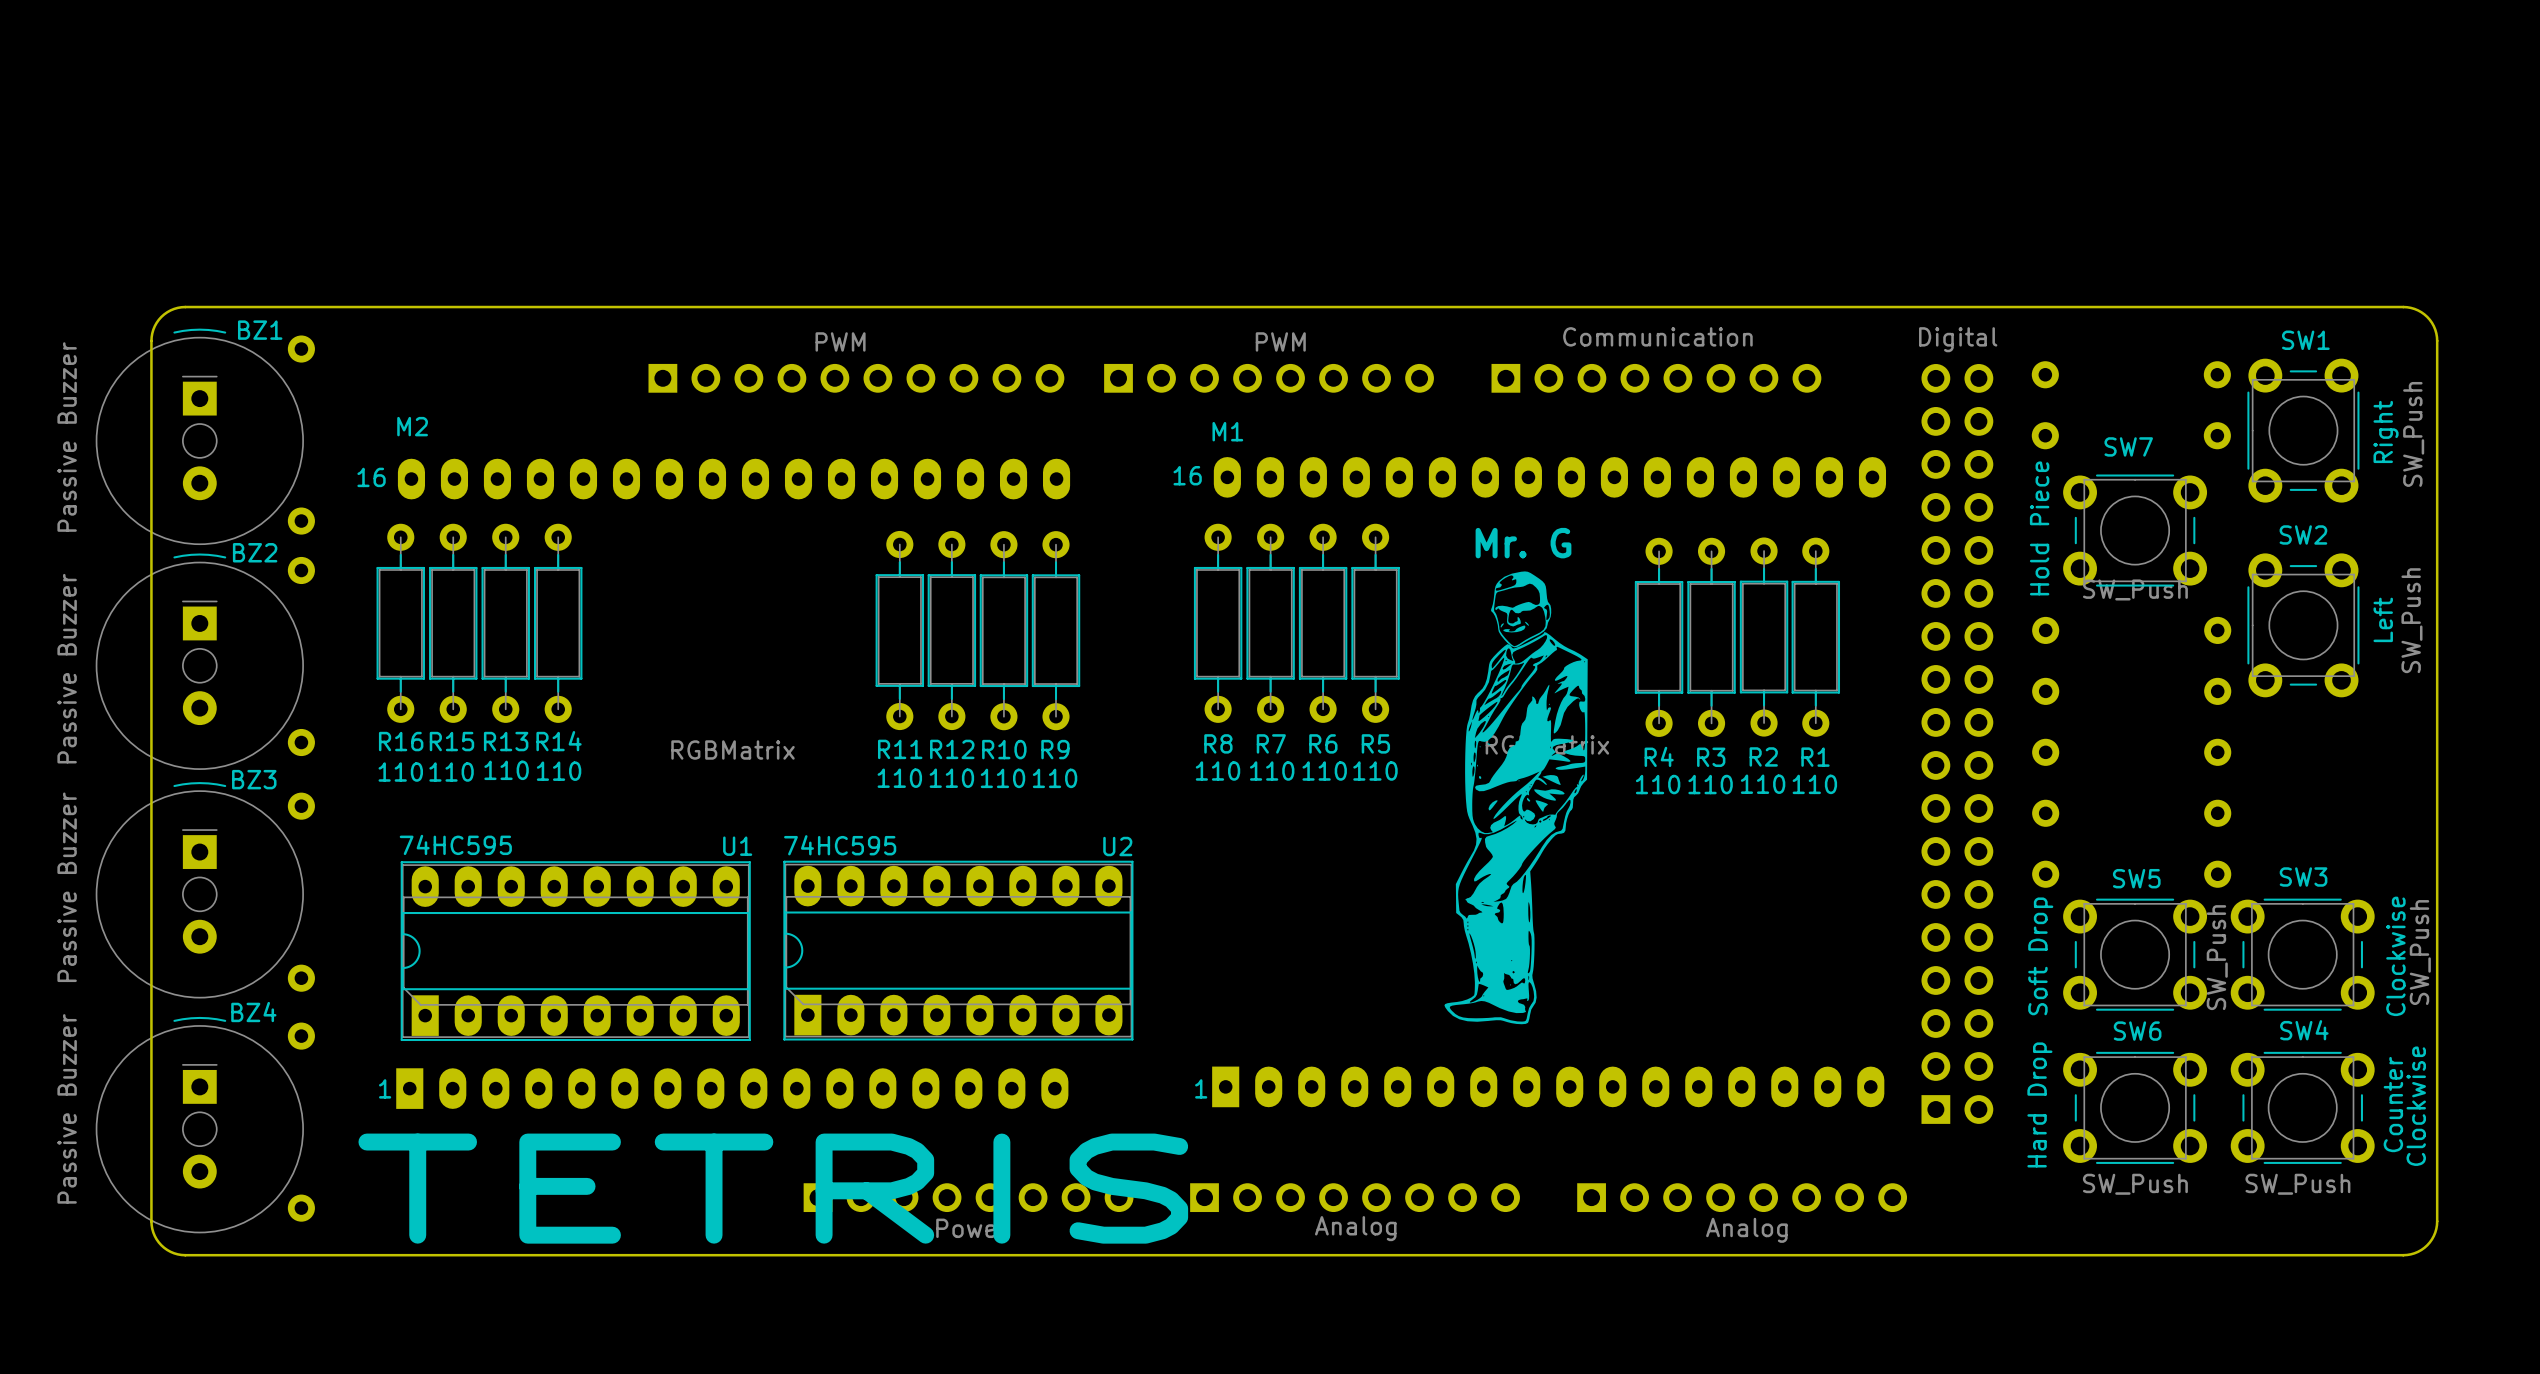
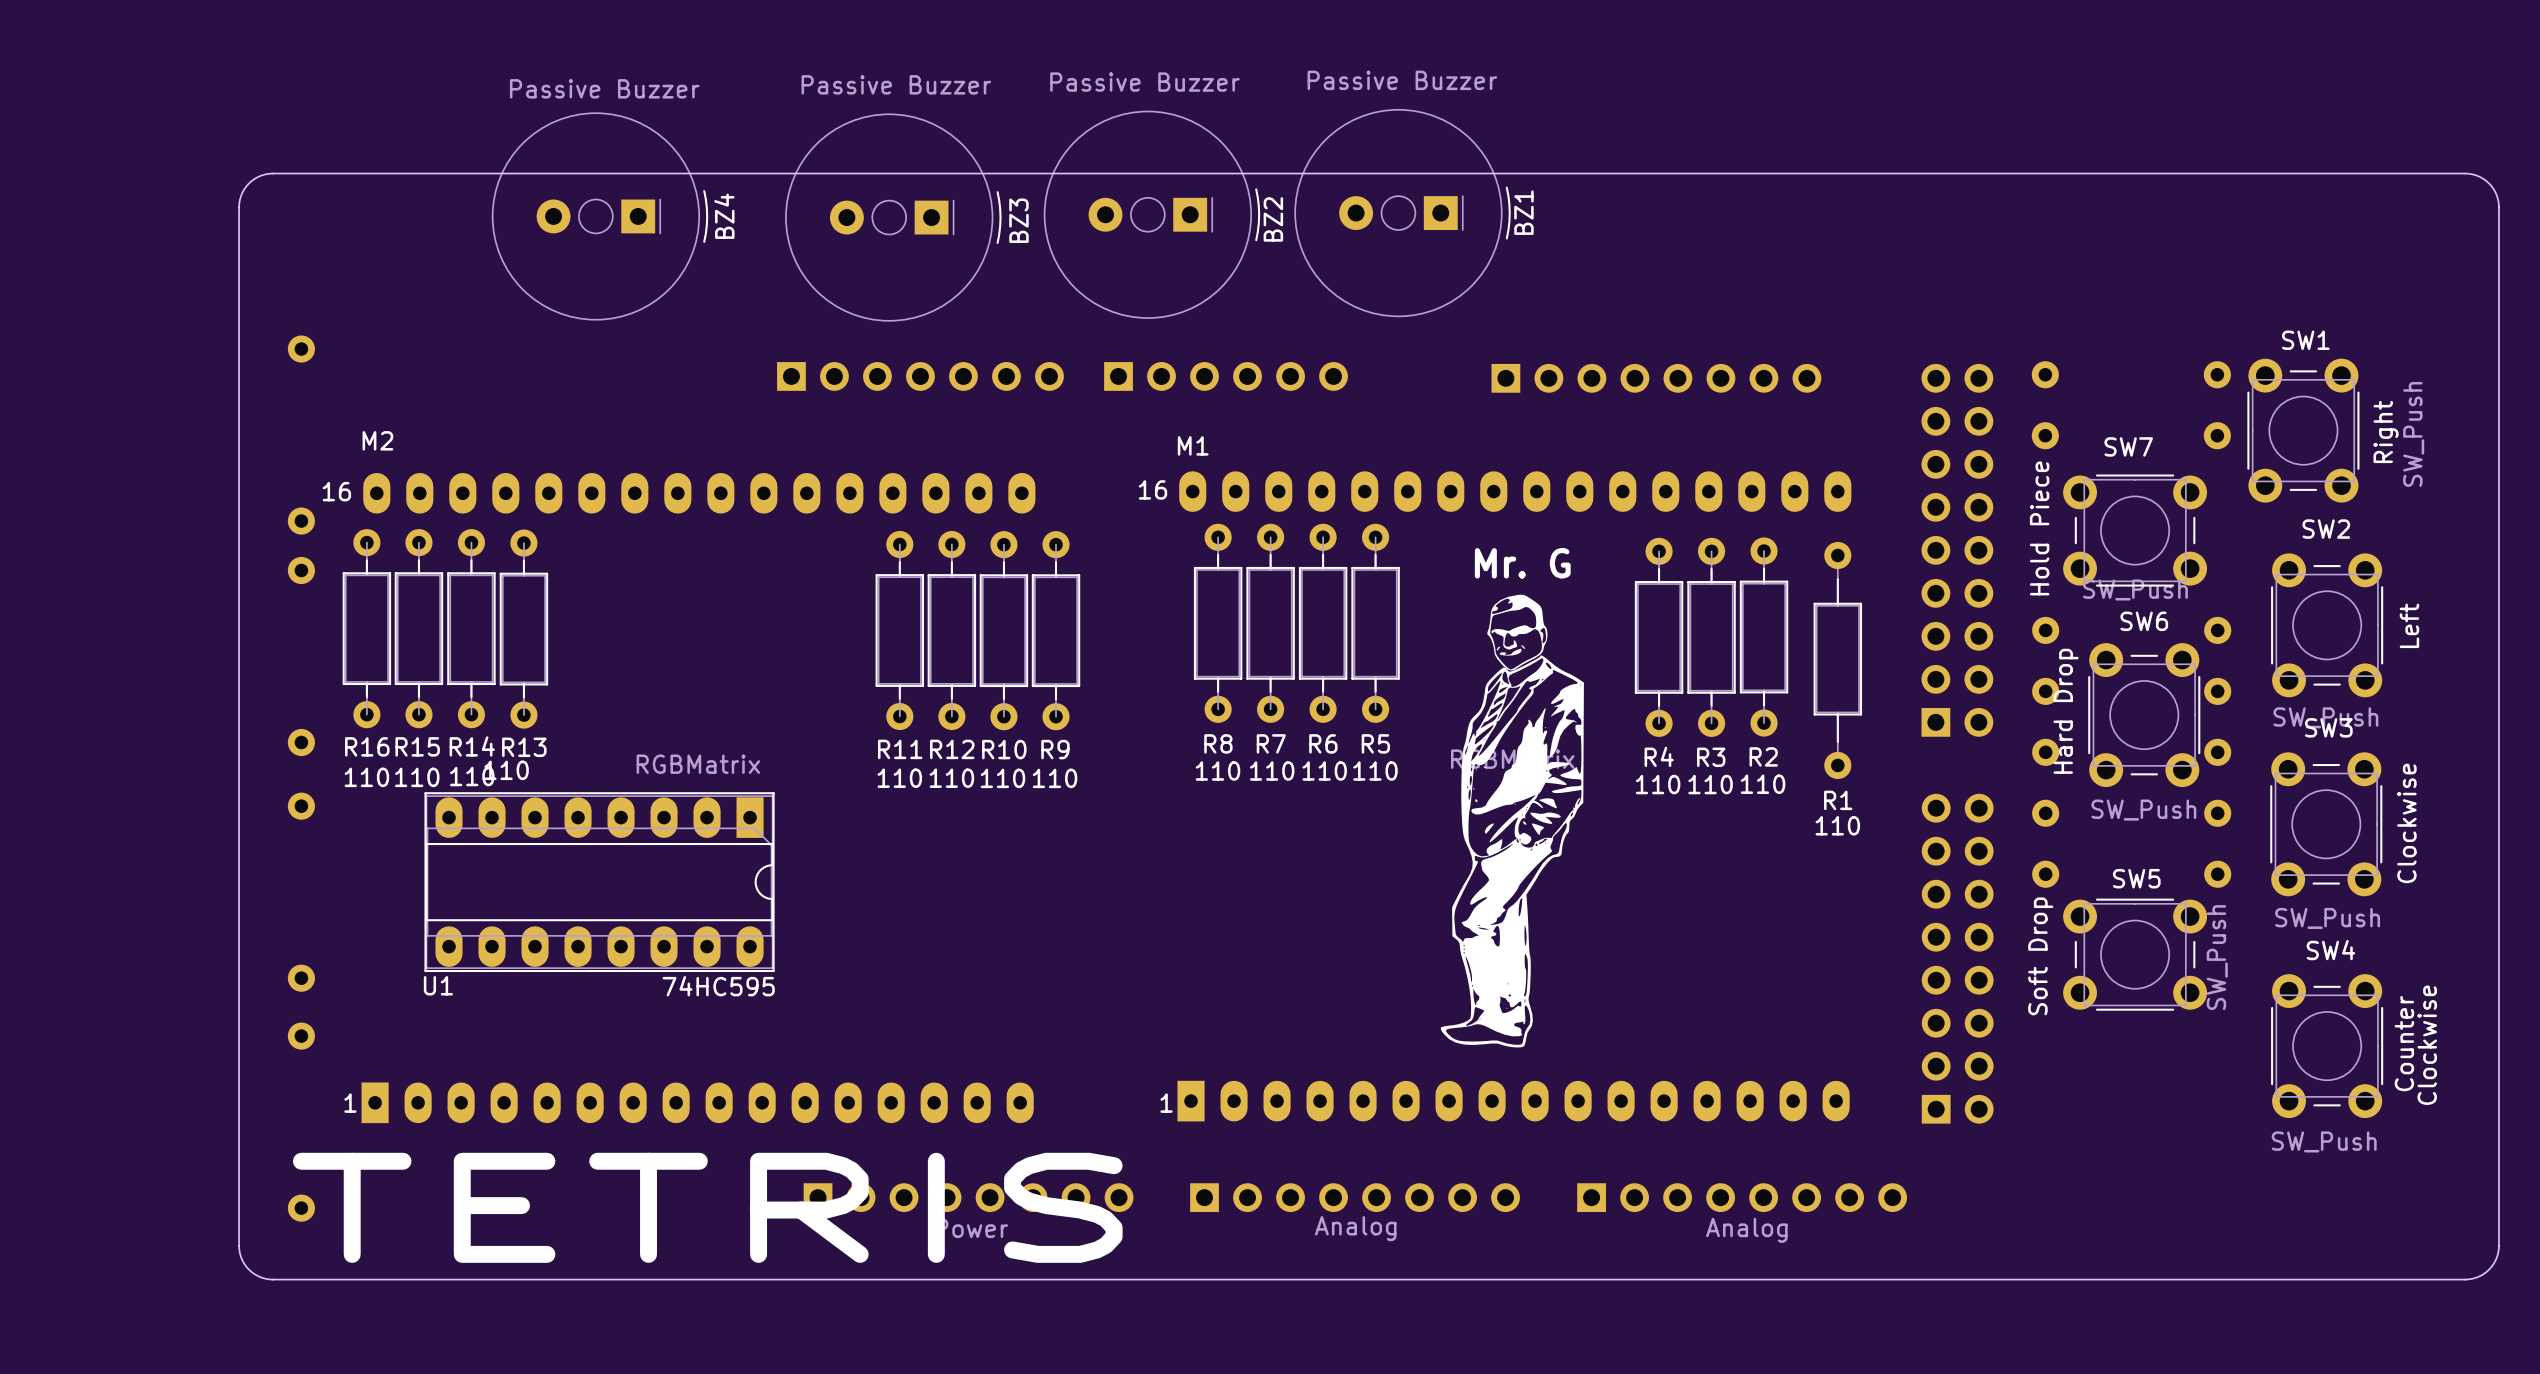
board edge: (185, 307) (2403, 307) (2414, 308) (2424, 314) (2431, 322) (2437, 340) (2437, 1221) (2435, 1232) (2424, 1247) (2414, 1253) (2403, 1255) (185, 1255) (174, 1253) (158, 1242) (153, 1232) (151, 1221) (151, 340) (153, 329) (161, 316) (174, 308) (185, 307) -> (272, 173) (261, 175) (248, 183) (242, 192) (239, 207) (239, 1245) (244, 1263) (258, 1276) (272, 1279) (2465, 1279) (2483, 1274) (2495, 1260) (2498, 1245) (2498, 207) (2493, 189) (2479, 176) (2465, 173) (272, 173)
BZ1 name position: BZ1 (260, 330) -> BZ1 (1523, 212)
part value: Communication (1657, 336) -> none
part: none -> (920, 376)
part: none -> (1226, 376)
part: PWM (856, 378) -> none
part: PWM (1269, 378) -> none
BZ1 rotation: 0° (199, 436) -> 90° clockwise (1402, 213)
BZ1 position: (199, 436) -> (1402, 213)
R1 footprint: [1791, 537, 1841, 737] -> [1813, 541, 1863, 780]
part: none -> (1957, 550)
BZ2 name position: BZ2 (255, 552) -> BZ2 (1273, 219)
SW2 footprint: [2247, 553, 2360, 698] -> [2271, 553, 2384, 698]
text: none -> Mr. G (1522, 563)
drawing position: (1521, 609) -> (1517, 632)
SW2 value position: SW_Push (2411, 620) -> SW_Push (2325, 717)
R16 position: (400, 623) -> (366, 628)
R15 position: (453, 623) -> (418, 628)
R13 position: (505, 623) -> (523, 629)
R14 position: (558, 623) -> (471, 628)
drawing: none -> [1440, 655, 1584, 1048]
BZ2 rotation: 0° (199, 661) -> 90° clockwise (1151, 214)
BZ2 position: (199, 661) -> (1151, 214)
part: Digital (1957, 743) -> none
BZ3 name position: BZ3 (254, 779) -> BZ3 (1018, 220)
M1 position: (1549, 782) -> (1514, 796)
M2 position: (733, 783) -> (698, 798)
Mr. G: (1516, 828) -> none
BZ3 rotation: 0° (199, 890) -> 90° clockwise (893, 217)
BZ3 position: (199, 890) -> (893, 217)
SW3 footprint: [2230, 898, 2375, 1011] -> [2270, 752, 2383, 897]
U2: 74HC595 (958, 950) -> none
U1 rotation: 0° (575, 951) -> 180° (599, 882)
SW3 value position: SW_Push (2420, 952) -> SW_Push (2327, 918)
part: none -> (1957, 958)
BZ4 name position: BZ4 (253, 1012) -> BZ4 (724, 216)
SW6 footprint: [2063, 1051, 2208, 1164] -> [2088, 643, 2201, 788]
SW4 footprint: [2230, 1051, 2375, 1164] -> [2271, 974, 2384, 1119]
BZ4 rotation: 0° (199, 1125) -> 90° clockwise (599, 216)
BZ4 position: (199, 1125) -> (599, 216)
text position: TETRIS (773, 1188) -> TETRIS (707, 1207)

